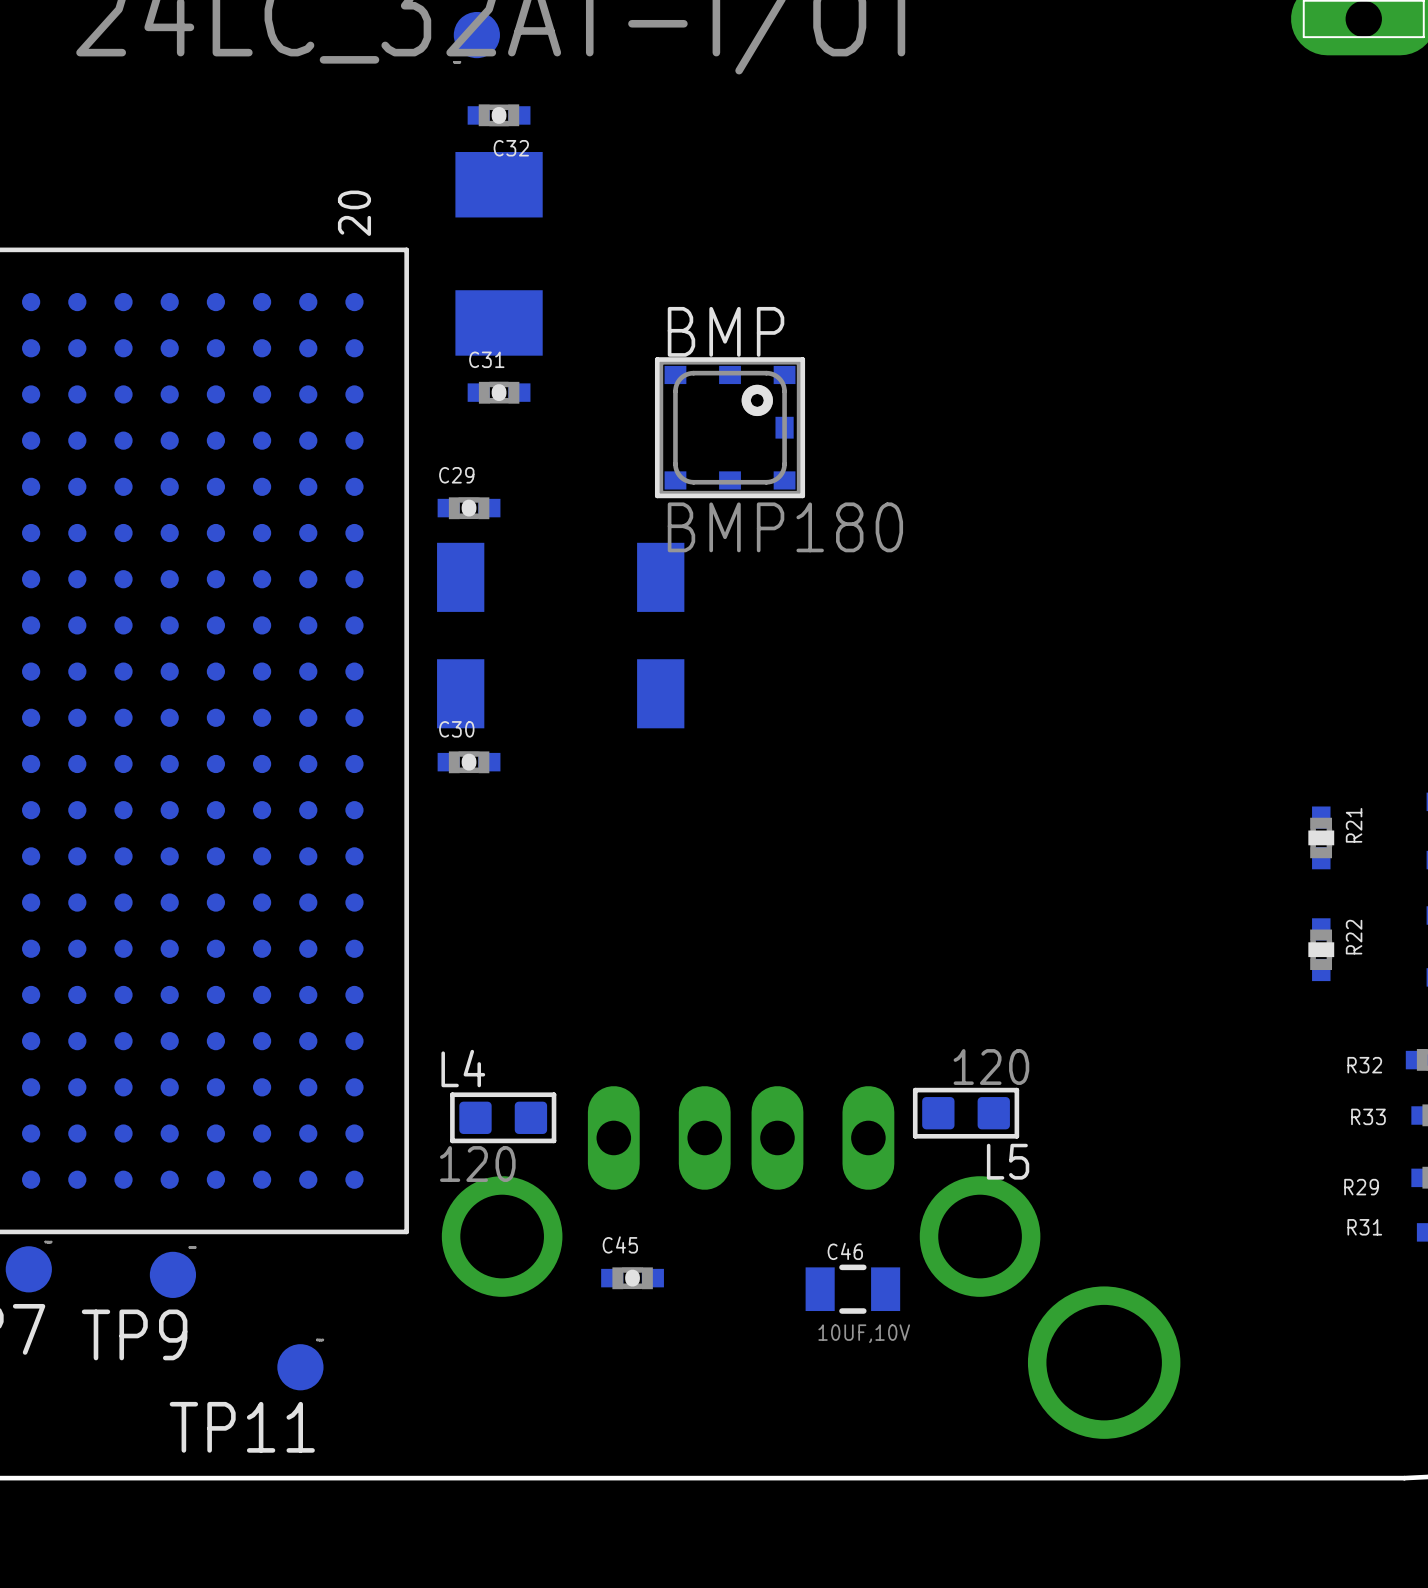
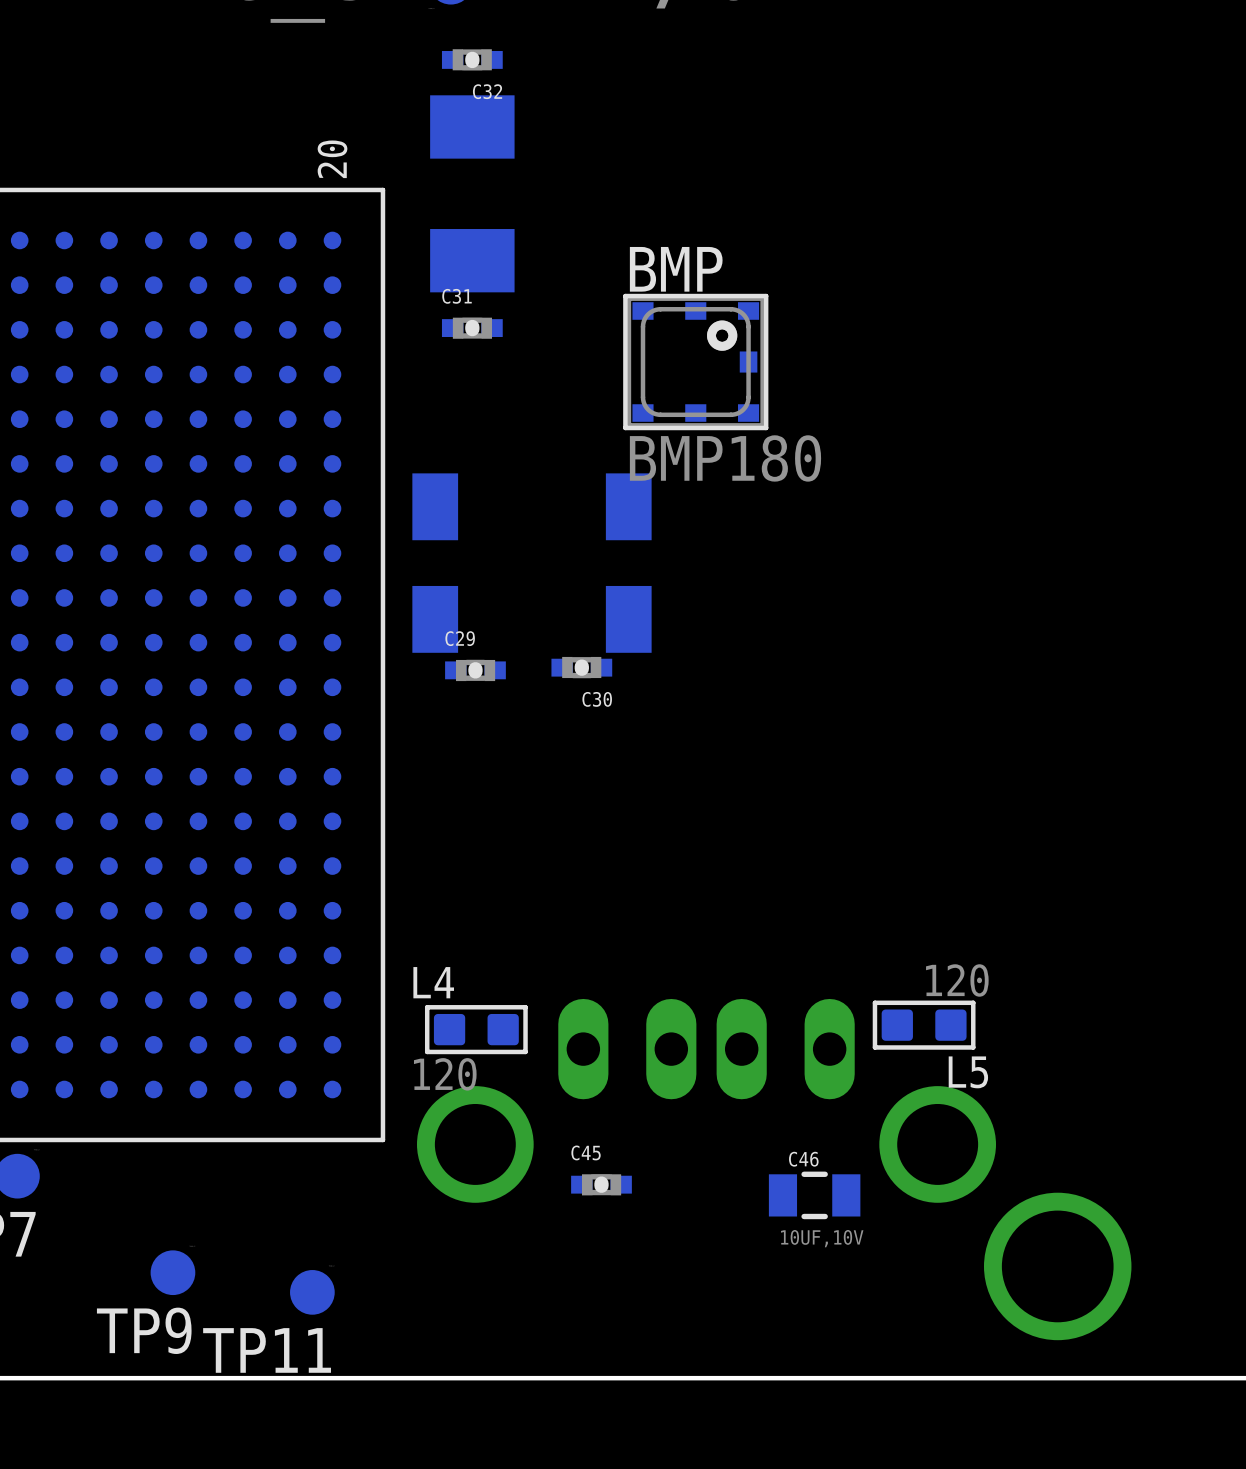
C29 position: (469, 508) -> (475, 670)
C30 name position: C30 (456, 729) -> C30 (597, 699)
C30 position: (469, 762) -> (581, 667)
TP9 position: (172, 1274) -> (172, 1272)
TP11 position: (300, 1367) -> (312, 1292)

